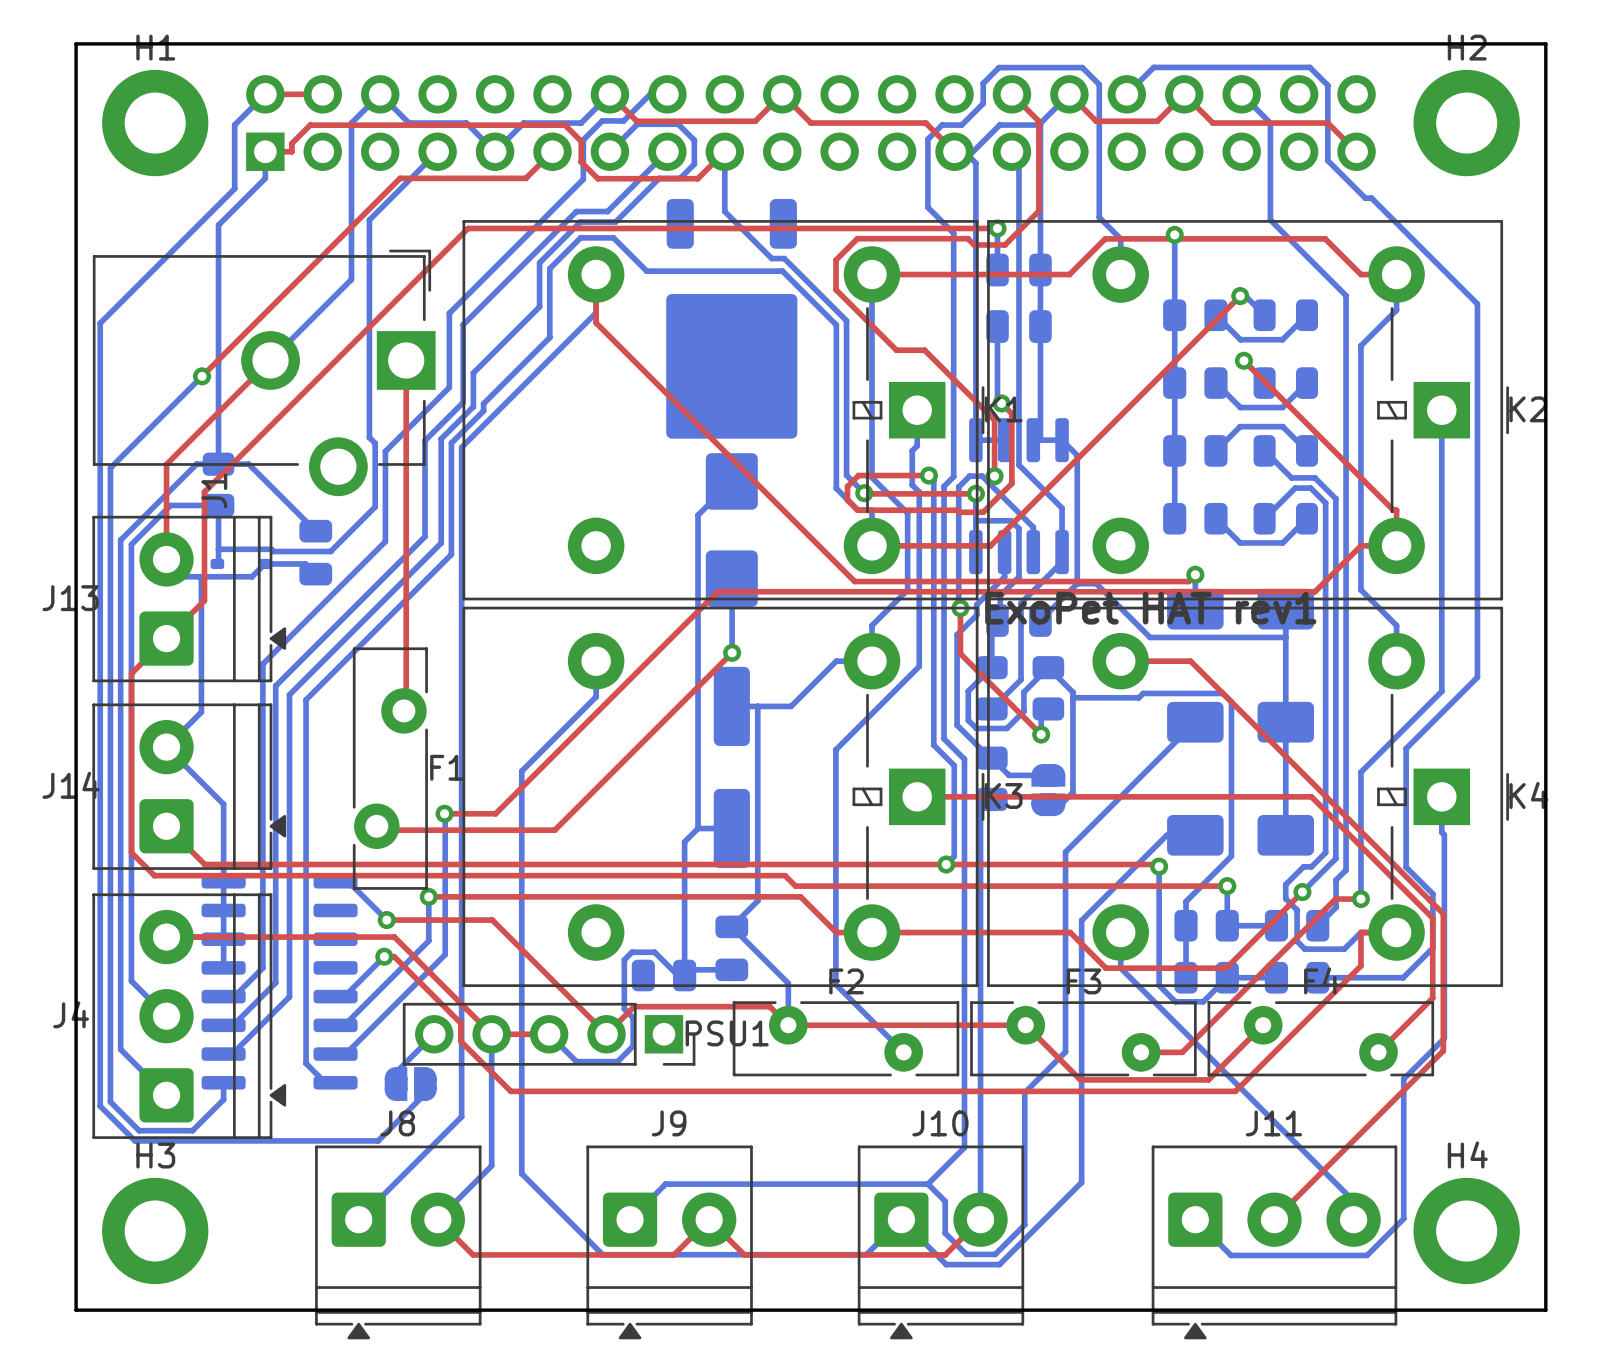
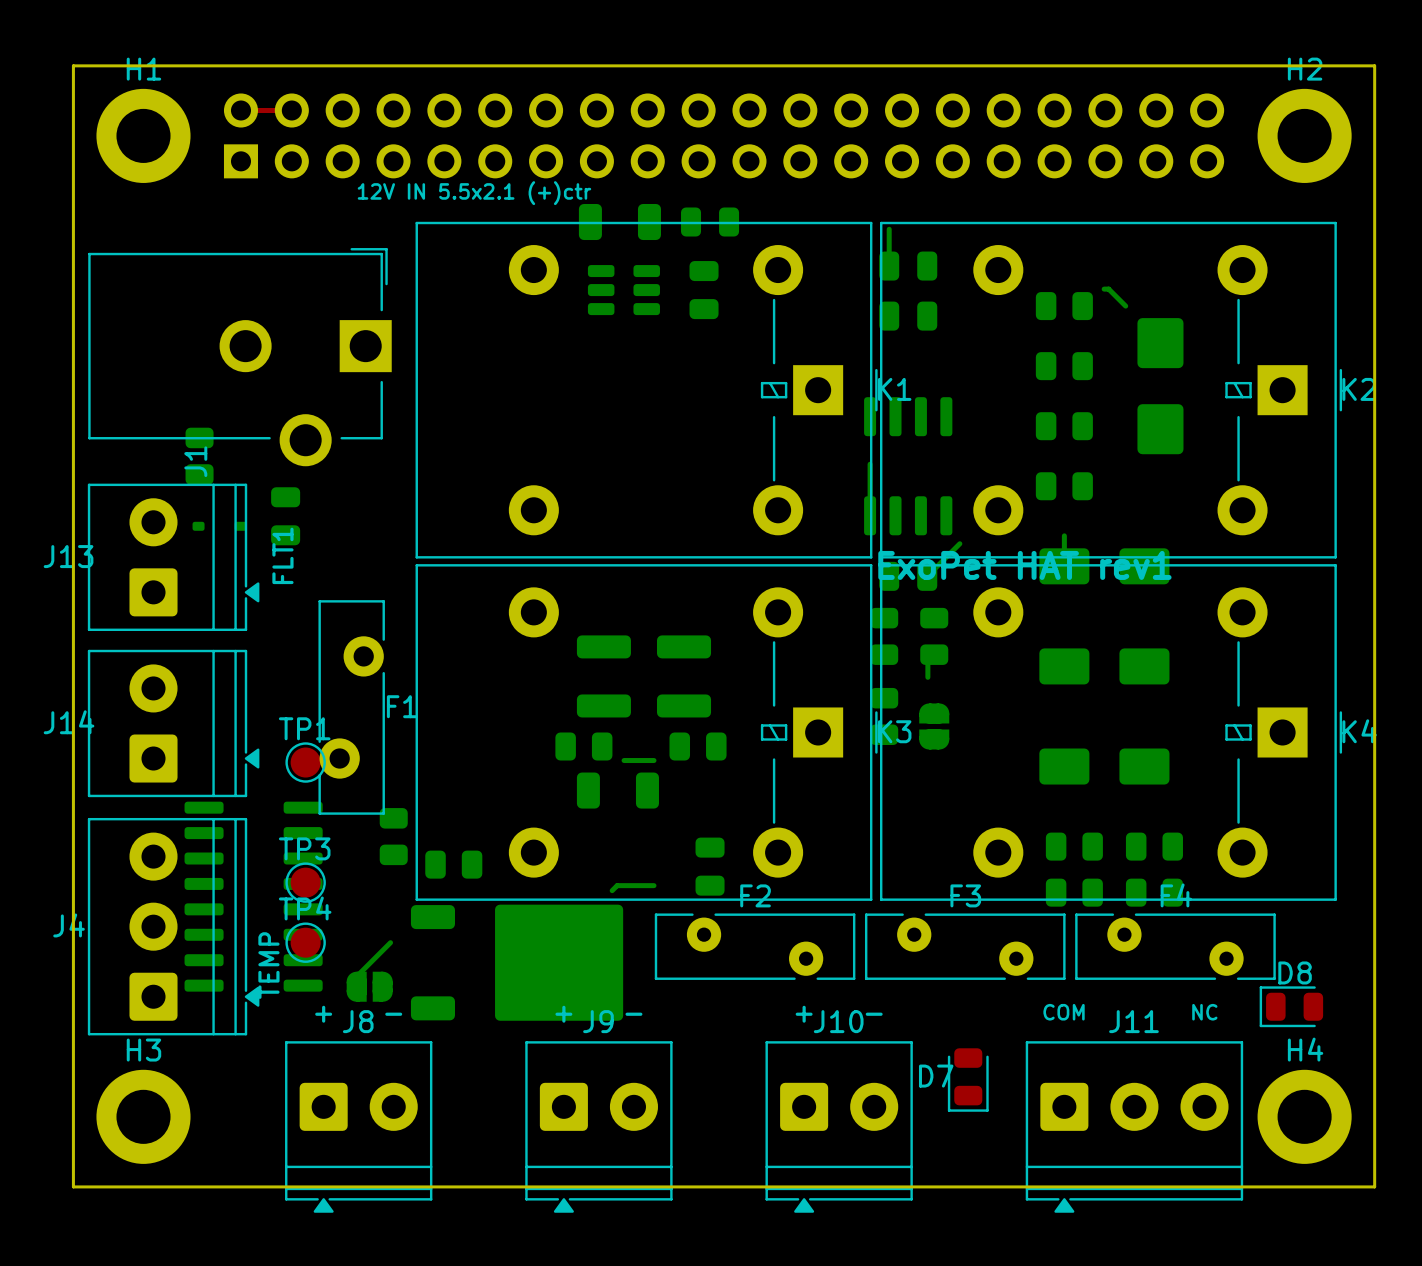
bottom track: (265, 94) (234, 124) (234, 188) (100, 323) (100, 1106) (134, 1140) (378, 1140) (425, 1093) (425, 1084) -> none
top track: (609, 94) (636, 121) (755, 121) (782, 94) (810, 123) (925, 123) (954, 151) -> none
bottom track: (609, 94) (581, 123) (523, 123) (495, 151) (466, 123) (408, 123) (380, 94) (351, 123) (351, 279) (270, 360) -> none
bottom track: (667, 94) (650, 94) (623, 120) (602, 120) (583, 139) (583, 179) (449, 313) (449, 387) (385, 451) (385, 541) (262, 664) (262, 968) (234, 996) (223, 996) -> none
top track: (1011, 94) (1038, 121) (1038, 211) (1005, 244) (974, 244) (967, 238) (857, 238) (836, 260) (836, 289) (896, 350) (924, 350) (994, 420) (994, 476) -> none
top track: (1069, 94) (1096, 121) (1157, 121) (1184, 94) (1212, 123) (1327, 123) (1356, 151) -> none
bottom track: (1069, 94) (1040, 123) -> none
bottom track: (1126, 94) (1153, 67) (1309, 67) (1327, 85) (1327, 160) (1365, 198) (1371, 198) (1477, 304) (1477, 677) (1406, 748) (1406, 867) (1432, 893) (1432, 948) (1403, 977) (1317, 977) -> none
bottom track: (1241, 94) (1270, 123) (1270, 220) (1346, 295) (1346, 870) (1336, 880) (1336, 907) (1317, 925) -> none
top track: (265, 151) (291, 151) (291, 143) (310, 125) (565, 125) (581, 141) (581, 162) (597, 178) (697, 178) (724, 151) -> none
bottom track: (265, 151) (265, 178) (218, 225) (218, 464) -> none
bottom track: (437, 151) (369, 219) (369, 437) (375, 443) (375, 506) (330, 551) (218, 549) -> none
top track: (552, 151) (525, 178) (400, 178) (202, 376) -> none
bottom track: (609, 151) (637, 124) (678, 124) (694, 140) (694, 164) (680, 178) (659, 178) (615, 222) (580, 222) (539, 262) (539, 306) (473, 373) (473, 406) (441, 438) (441, 543) (289, 694) (289, 996) (232, 1054) (223, 1054) -> none
bottom track: (667, 151) (607, 211) (576, 211) (463, 324) (463, 402) (425, 440) (425, 536) (275, 685) (275, 982) (233, 1025) (223, 1025) -> none
bottom track: (724, 151) (724, 211) (771, 258) (784, 258) (846, 320) (846, 475) (864, 493) -> none
bottom track: (954, 151) (964, 151) (975, 163) (975, 440) (1004, 440) -> none
bottom track: (1011, 151) (1018, 158) (1018, 465) (1062, 508) (1062, 562) (1021, 603) (1021, 679) (991, 708) -> none
bottom track: (968, 156) (999, 125) (1040, 125) (1040, 440) -> none
text: none -> 12V IN 5.5x2.1 (+)ctr (474, 193)
part: none -> (619, 222)
part: none -> (710, 222)
top track: (997, 228) (468, 228) (204, 492) (204, 600) (131, 673) (131, 852) (154, 875) (785, 875) (795, 886) (1227, 886) -> none
via: (997, 228) -> none
bottom track: (1174, 234) (1174, 518) -> none
via: (1174, 234) -> none
top track: (596, 274) (596, 322) (854, 581) (1188, 581) (1195, 574) -> none
bottom track: (596, 274) (596, 312) (461, 447) (461, 1116) (358, 1219) -> none
top track: (872, 274) (1069, 274) (1105, 238) (1325, 238) (1360, 274) (1396, 274) -> none
bottom track: (872, 274) (872, 477) (907, 513) (907, 589) (872, 625) (872, 661) (836, 661) (791, 706) (731, 706) -> none
bottom track: (1120, 274) (1120, 238) (1099, 217) (1099, 84) (1082, 67) (999, 67) (983, 83) (983, 103) (961, 125) (942, 125) (927, 139) (927, 207) (953, 233) (953, 476) (944, 486) (944, 738) (964, 759) (964, 1147) (927, 1184) -> none
bottom track: (1396, 274) (1396, 310) (1360, 345) (1360, 589) (1396, 625) (1396, 661) -> none
top track: (1240, 296) (990, 545) (872, 545) -> none
via: (1240, 296) -> none
part: none -> (623, 290)
part: none -> (704, 290)
bottom track: (1215, 315) (1240, 339) (1282, 339) (1306, 315) -> none
part: (1285, 315) -> none
part: (731, 318) -> none
bottom track: (997, 326) (997, 399) (1001, 403) -> none
top track: (270, 360) (166, 464) (166, 559) -> none
top track: (406, 360) (406, 708) (403, 710) -> none
top track: (1243, 360) (1393, 510) (1396, 510) (1396, 545) (1360, 545) (1315, 591) (717, 591) (495, 813) (444, 813) -> none
via: (1243, 360) -> none
bottom track: (202, 376) (110, 467) (110, 1101) (139, 1130) (192, 1130) (223, 1099) (223, 1082) -> none
via: (202, 376) -> none
bottom track: (1215, 383) (1240, 407) (1282, 407) (1306, 383) -> none
part: (1285, 383) -> none
top track: (1001, 403) (1011, 413) (1011, 483) (983, 512) (958, 512) (956, 510) (857, 510) (847, 500) (847, 486) (858, 475) (928, 475) -> none
via: (1001, 403) -> none
part: none -> (1160, 386)
bottom track: (917, 410) (917, 445) (912, 450) (912, 485) (919, 492) (919, 666) (835, 749) (835, 984) (903, 1052) -> none
bottom track: (1441, 410) (1441, 691) (1360, 772) (1360, 899) -> none
bottom track: (1033, 440) (1062, 440) (1077, 455) (1077, 583) (1096, 583) (1150, 637) (1285, 637) -> none
bottom track: (1215, 450) (1240, 426) (1282, 426) (1306, 450) -> none
bottom track: (1264, 450) (1291, 477) (1314, 477) (1335, 498) (1335, 858) (1302, 892) -> none
part: (1285, 450) -> none
bottom track: (928, 475) (933, 480) (933, 745) (954, 765) (954, 856) (946, 864) -> none
via: (928, 475) -> none
via: (994, 476) -> none
bottom track: (731, 481) (698, 515) (698, 828) (684, 841) (684, 975) (677, 975) (654, 952) (632, 952) (624, 959) (624, 1009) (633, 1017) (633, 1046) (617, 1061) (576, 1061) (549, 1034) -> none
bottom track: (988, 482) (982, 476) (969, 476) (958, 487) (958, 606) (960, 608) -> none
bottom track: (988, 482) (1033, 527) (1033, 552) -> none
via: (864, 493) -> none
top track: (865, 493) (975, 493) -> none
via: (975, 493) -> none
bottom track: (1215, 518) (1240, 542) (1282, 542) (1306, 518) -> none
bottom track: (1264, 518) (1295, 488) (1310, 488) (1325, 503) (1325, 852) (1311, 866) (1303, 866) (1285, 884) (1285, 898) (1297, 910) (1297, 941) (1304, 949) (1344, 949) (1360, 932) (1396, 932) -> none
part: (1285, 518) -> none
bottom track: (975, 520) (1011, 520) (1018, 528) (1018, 577) (1000, 595) (1000, 617) (991, 626) (991, 667) (968, 691) (968, 720) (976, 728) (1006, 728) (1023, 711) (1023, 692) (1048, 667) (1072, 692) (1072, 792) (1060, 804) (1048, 804) -> none
part: (731, 530) -> none
bottom track: (315, 531) (248, 464) (196, 464) (120, 540) (120, 1049) (166, 1095) -> none
bottom track: (872, 545) (872, 510) (858, 510) (836, 488) (836, 325) (782, 271) (646, 271) (613, 237) (580, 237) (549, 268) (549, 337) (483, 403) (483, 410) (451, 443) (451, 554) (306, 699) (306, 1063) (325, 1082) (335, 1082) -> none
bottom track: (1004, 552) (1004, 576) (976, 604) (976, 615) (957, 634) (957, 725) (990, 758) -> none
bottom track: (166, 559) (183, 576) (252, 576) (264, 563) (305, 563) (315, 574) -> none
bottom track: (218, 562) (218, 505) (170, 505) (131, 544) (131, 981) (166, 1016) -> none
via: (1195, 574) -> none
bottom track: (201, 576) (201, 712) (166, 747) (223, 804) (223, 937) (166, 937) -> none
bottom track: (732, 578) (732, 652) -> none
text: none -> FLT1 (282, 555)
top track: (960, 608) (960, 653) (1041, 734) -> none
via: (960, 608) -> none
bottom track: (1285, 609) (1285, 835) -> none
top track: (732, 652) (554, 830) (380, 830) (376, 826) -> none
via: (732, 652) -> none
bottom track: (596, 661) (596, 696) (521, 771) (521, 1173) (602, 1254) (866, 1254) (901, 1219) (946, 1264) (999, 1264) (1081, 1182) (1081, 920) (1166, 835) (1195, 835) -> none
top track: (1120, 661) (1190, 661) (1443, 913) (1443, 1050) (1274, 1219) -> none
bottom track: (1072, 697) (1138, 697) (1143, 693) (1223, 693) (1231, 701) (1231, 856) (1186, 901) (1186, 977) -> none
bottom track: (757, 706) (757, 900) (731, 926) (788, 983) (788, 1025) -> none
bottom track: (1195, 722) (1065, 852) (1065, 1051) (1024, 1092) (1024, 1224) (995, 1254) (966, 1254) (945, 1233) (945, 1201) (927, 1184) -> none
part: none -> (603, 676)
part: none -> (684, 676)
via: (1041, 734) -> none
bottom track: (991, 758) (1009, 775) (1048, 775) -> none
part: (731, 767) -> none
top track: (917, 796) (1311, 796) (1432, 918) (1432, 998) (1378, 1052) -> none
bottom track: (1441, 796) (1441, 832) (1444, 835) (1444, 1038) (1403, 1079) (1403, 1218) (1367, 1255) (1231, 1255) (1195, 1219) -> none
bottom track: (991, 799) (980, 810) (980, 1219) -> none
part: none -> (583, 746)
part: none -> (698, 746)
via: (444, 813) -> none
bottom track: (445, 814) (445, 954) (345, 1054) (335, 1054) -> none
top track: (166, 826) (204, 864) (1157, 864) (1159, 866) -> none
TP1: none -> (305, 762)
part: none -> (617, 790)
via: (946, 864) -> none
bottom track: (1159, 866) (1159, 985) (1175, 1001) (1203, 1001) (1227, 977) (1276, 977) -> none
via: (1159, 866) -> none
bottom track: (335, 881) (348, 881) (386, 920) -> none
bottom track: (1227, 886) (1227, 925) (1276, 925) -> none
via: (1227, 886) -> none
top track: (1302, 892) (1226, 968) (1105, 968) (1070, 932) (836, 932) (800, 896) (428, 896) -> none
via: (1302, 892) -> none
bottom track: (428, 896) (428, 940) (344, 1025) (335, 1025) -> none
via: (428, 896) -> none
top track: (1360, 899) (1335, 899) (1182, 1052) (1141, 1052) -> none
via: (1360, 899) -> none
part: none -> (393, 836)
top track: (386, 920) (492, 920) (606, 1034) (634, 1006) (769, 1006) (788, 1025) (1025, 1025) (1080, 1079) (1208, 1079) (1263, 1025) -> none
via: (386, 920) -> none
bottom track: (1120, 932) (1120, 968) (1353, 1201) (1353, 1219) -> none
top track: (1396, 932) (1360, 932) (1360, 965) (1235, 1091) (510, 1091) (460, 1041) (460, 1023) (394, 956) (384, 956) -> none
top track: (166, 937) (394, 937) (491, 1034) (549, 1034) -> none
bottom track: (223, 939) (223, 967) -> none
part: none -> (453, 864)
part position: (731, 948) -> (710, 866)
bottom track: (384, 956) (344, 996) (335, 996) -> none
via: (384, 956) -> none
TP3: none -> (305, 882)
part: (663, 975) -> none
TP4: none -> (305, 942)
bottom track: (491, 1034) (491, 1165) (437, 1219) -> none
PSU1: (549, 1034) -> none
part: none -> (517, 962)
text: none -> TEMP (268, 965)
D8: none -> (1291, 1006)
text: none -> COM (1064, 1012)
text: none -> NC (1204, 1012)
text: none -> + (323, 1014)
text: none -> - (393, 1014)
text: none -> + (563, 1014)
text: none -> - (633, 1014)
text: none -> + (804, 1014)
text: none -> - (874, 1014)
bottom track: (927, 1184) (665, 1184) (630, 1219) -> none
D7: none -> (968, 1080)
top track: (437, 1219) (473, 1254) (673, 1254) (709, 1219) (744, 1254) (945, 1254) (980, 1219) -> none

